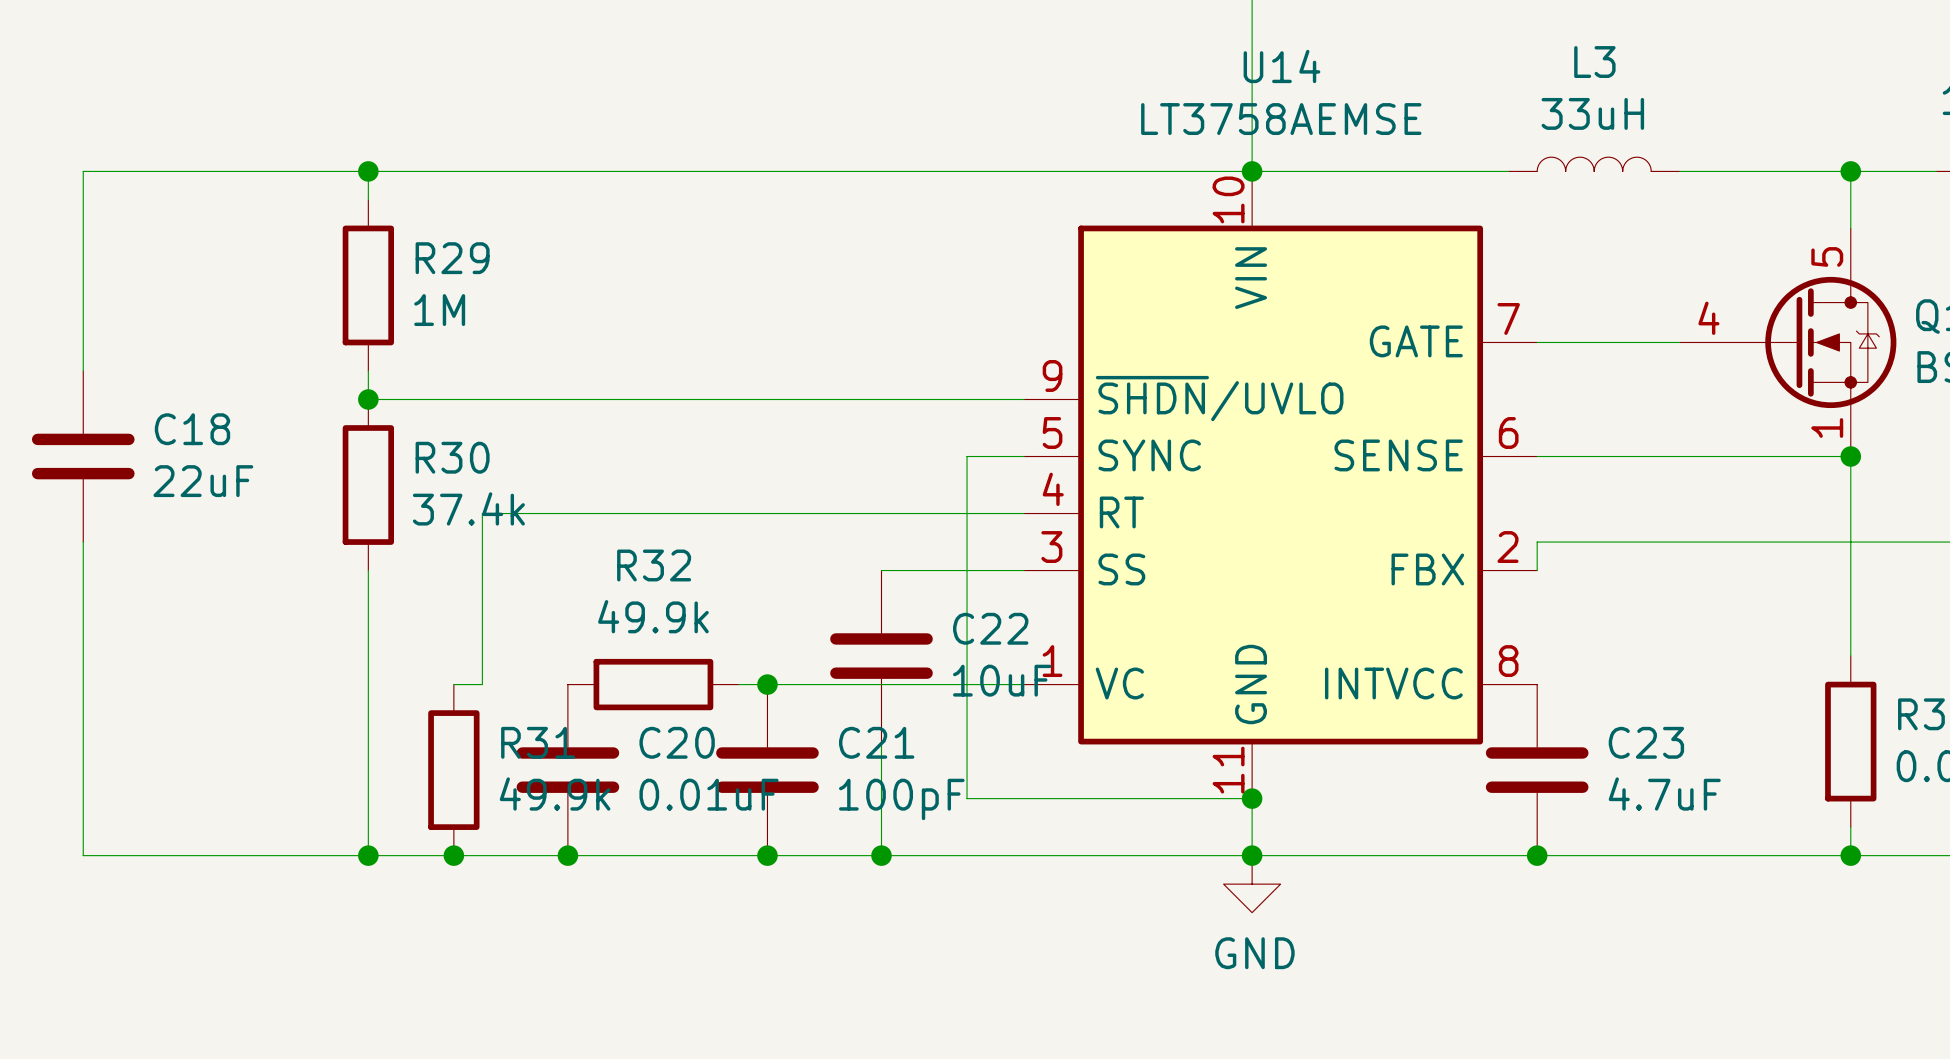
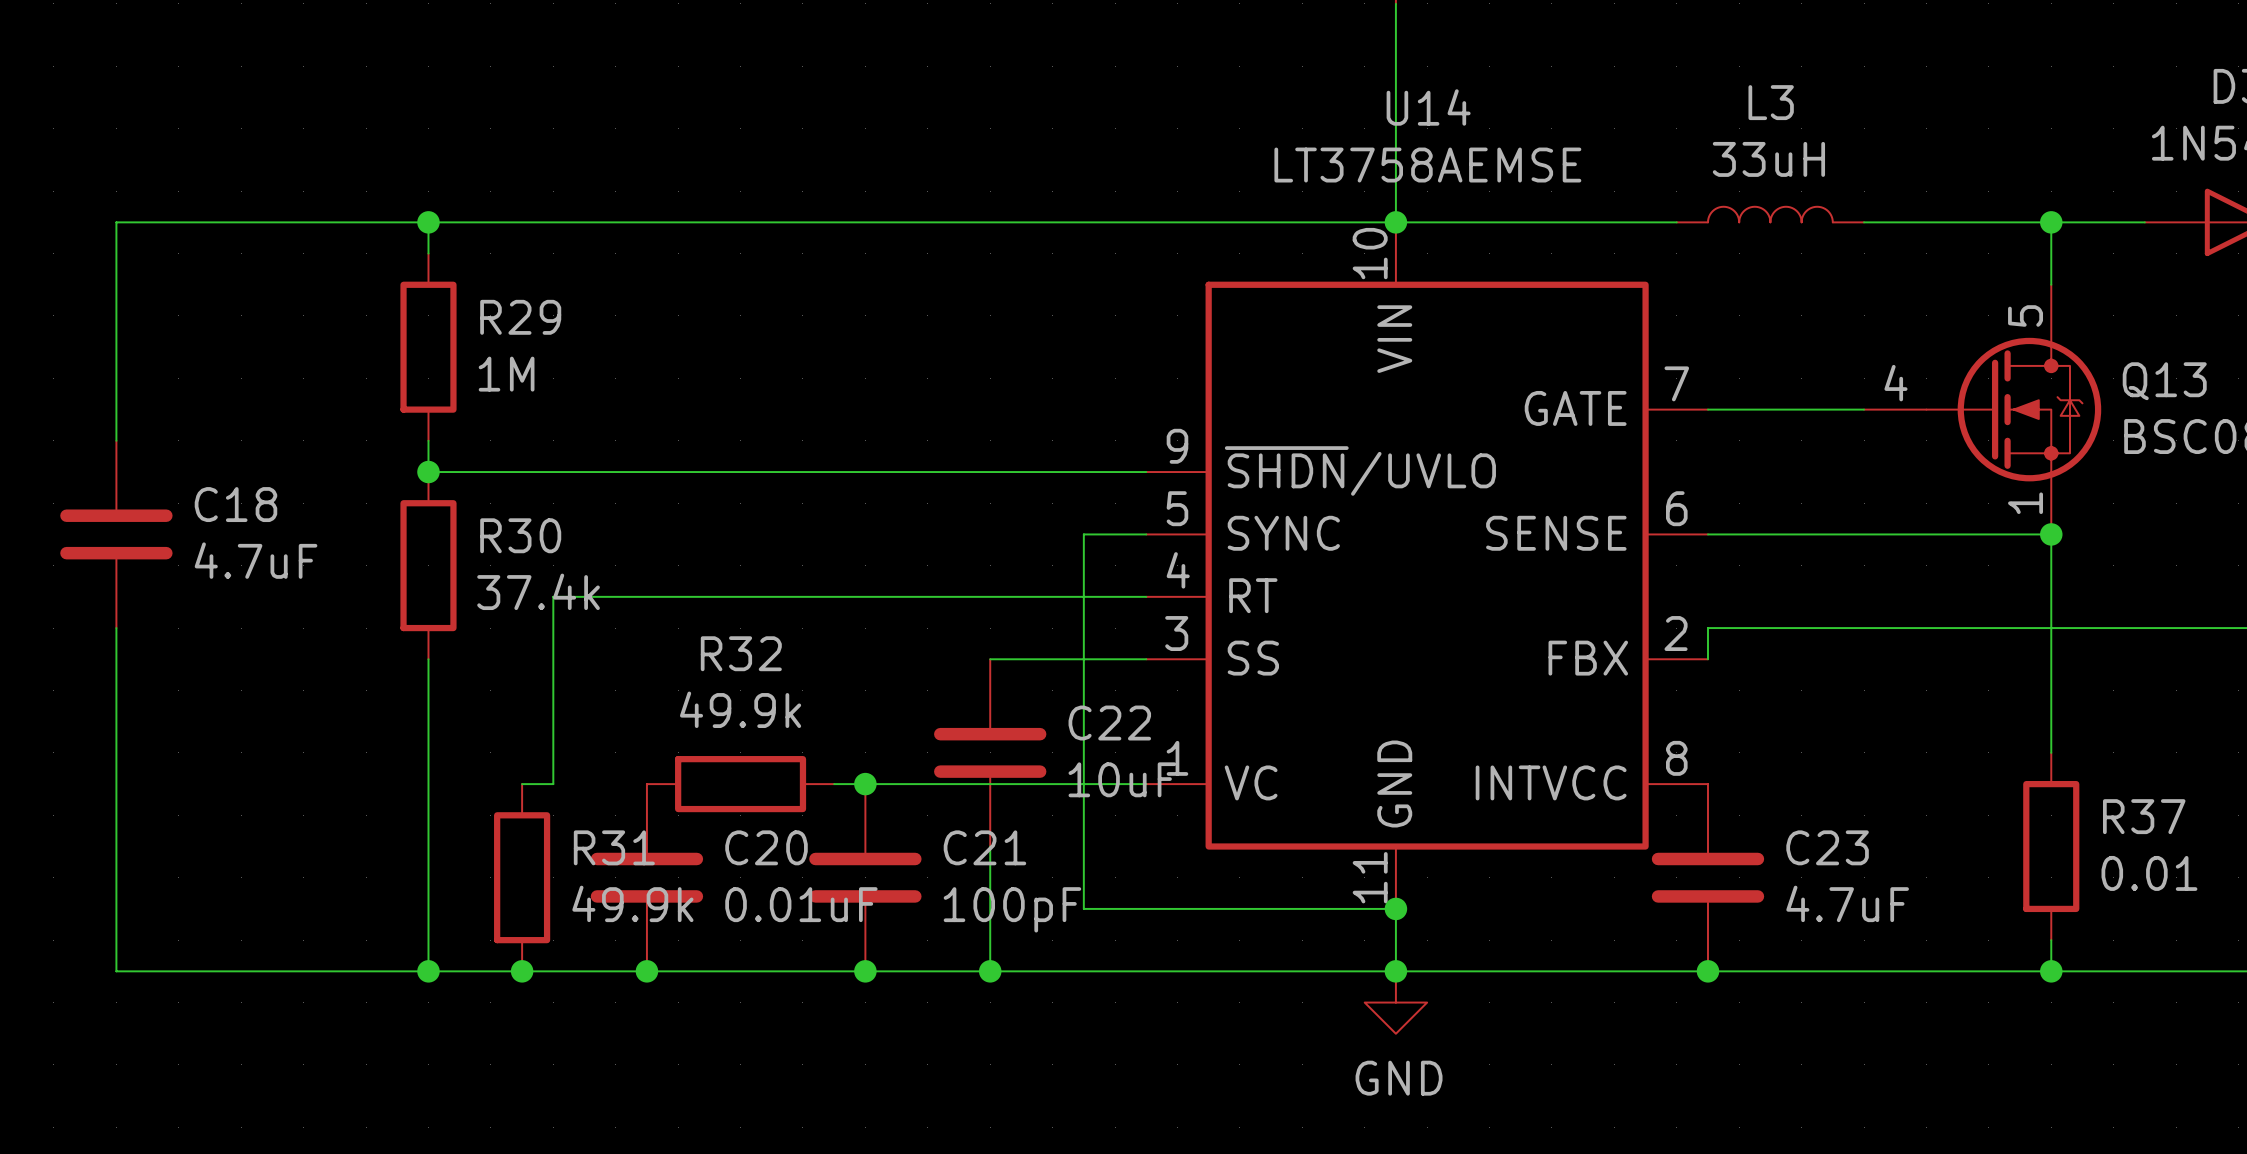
C18 value: 22uF (203, 481) -> 4.7uF (256, 560)

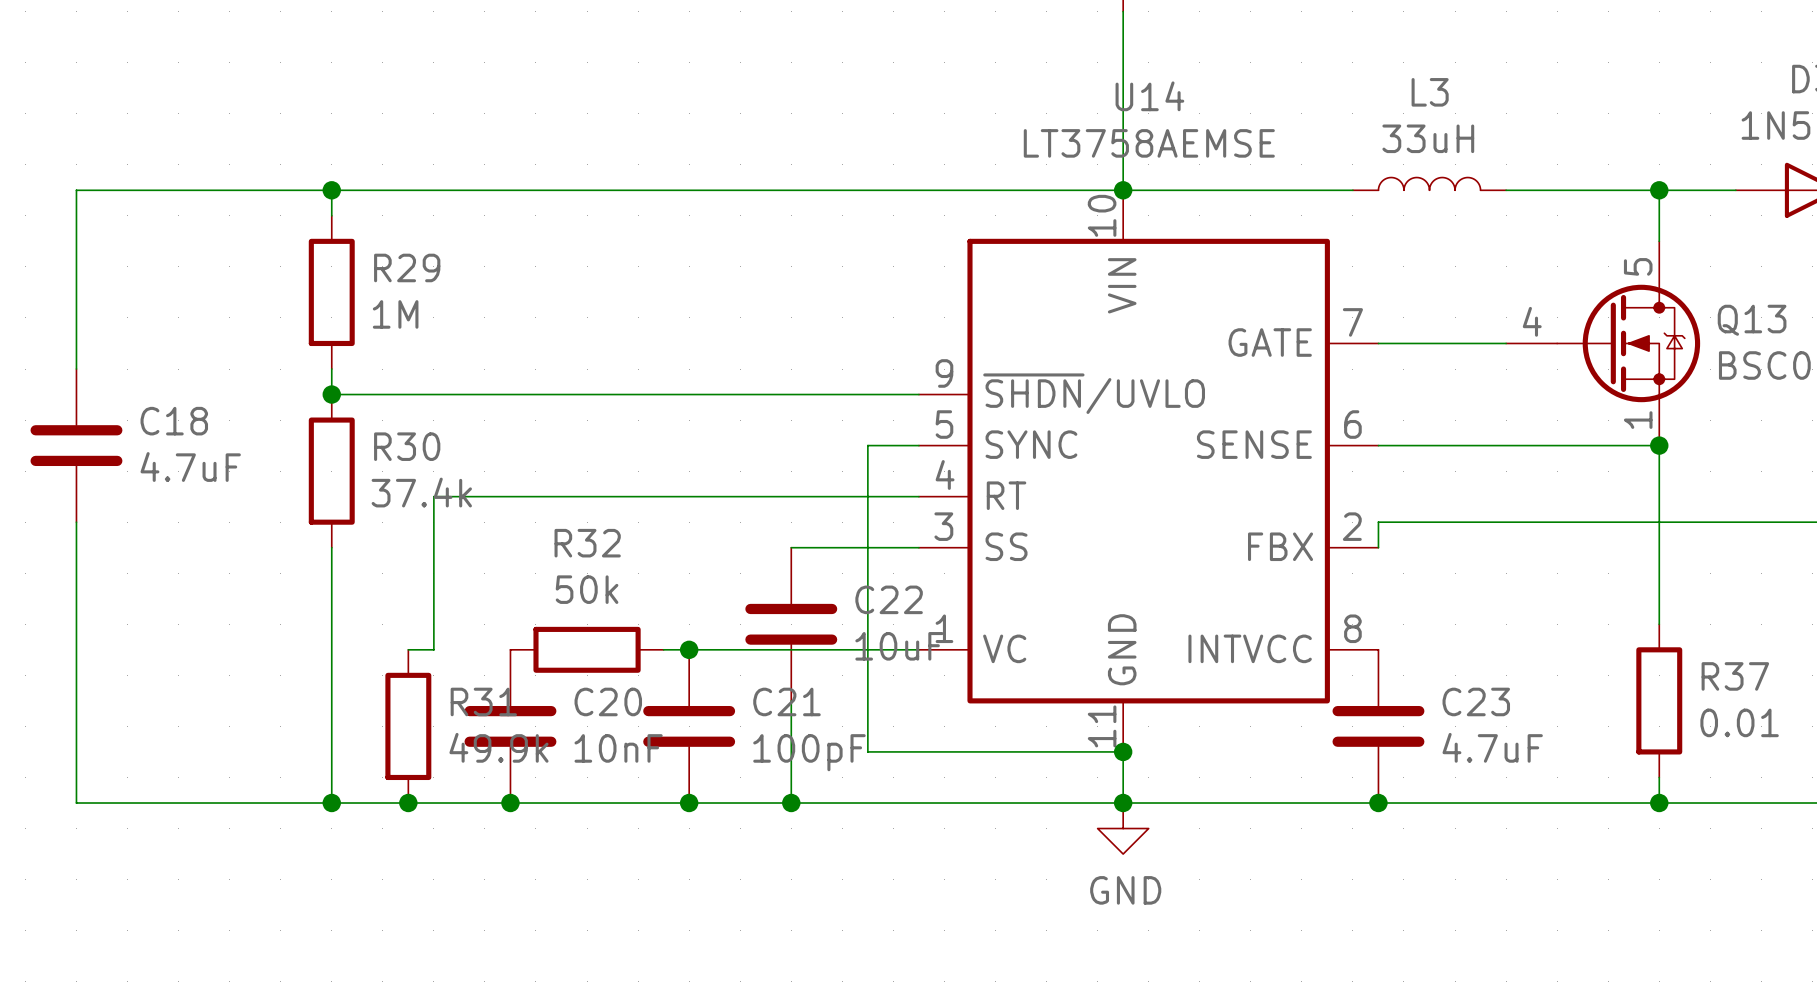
R32 value: 49.9k (740, 709) -> 50k (587, 589)
C20 value: 0.01uF (801, 904) -> 10nF (618, 748)

